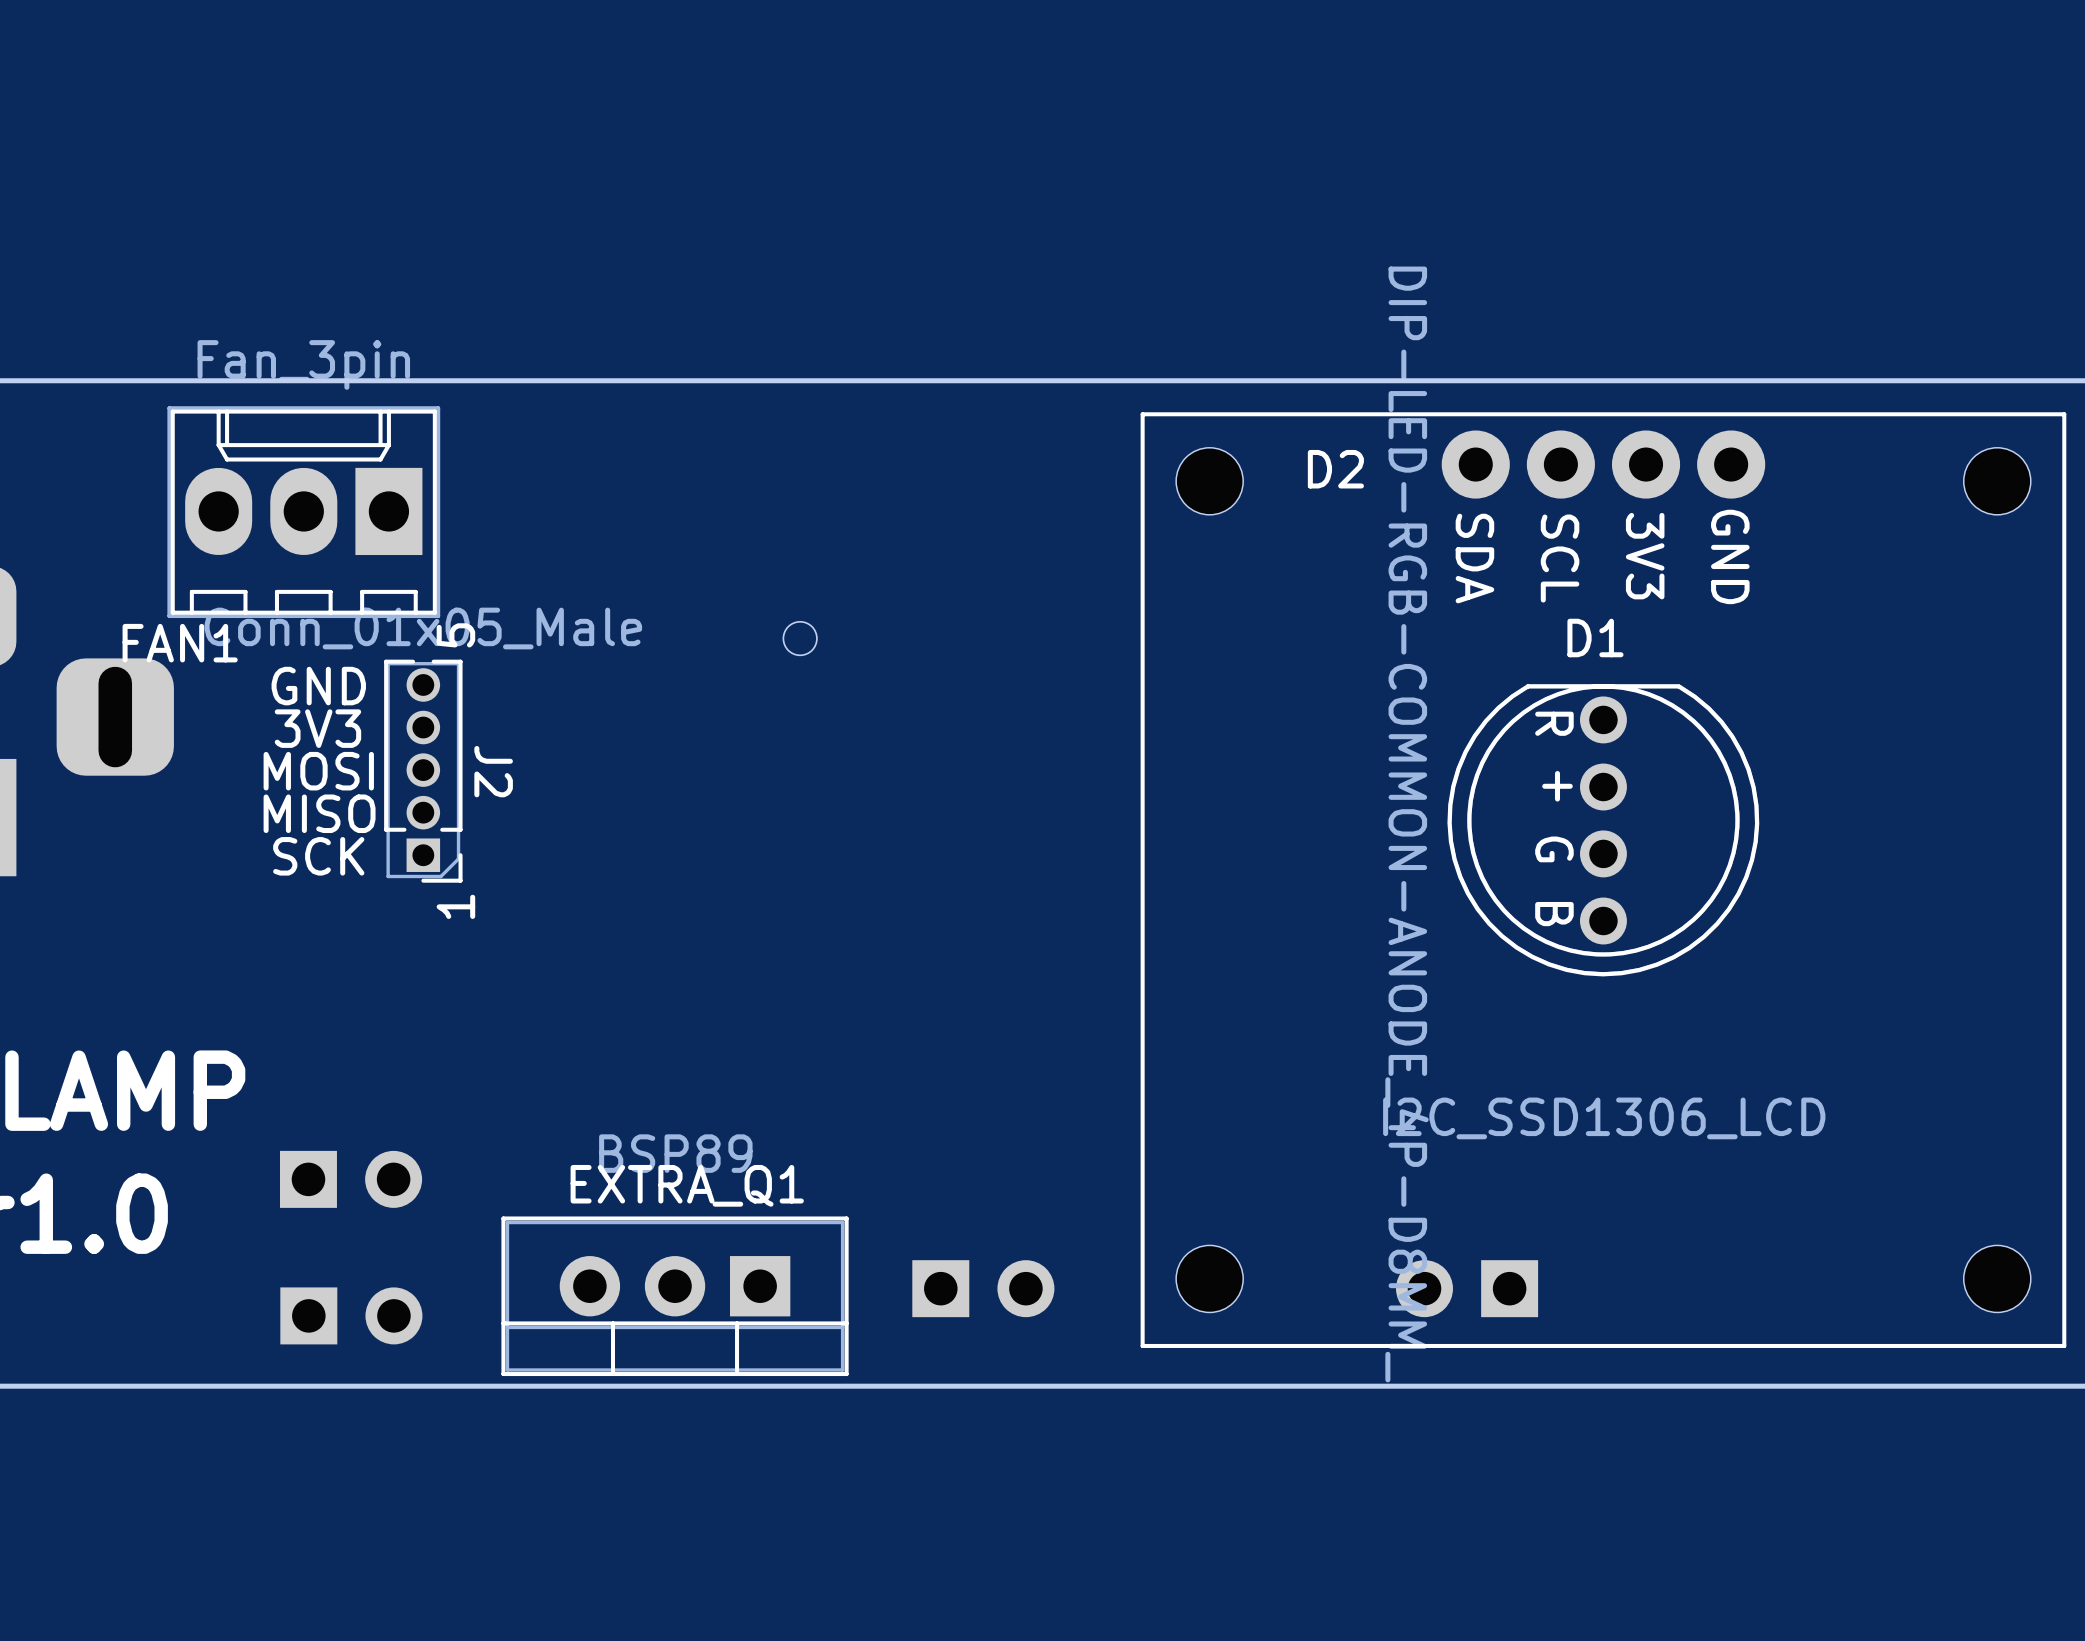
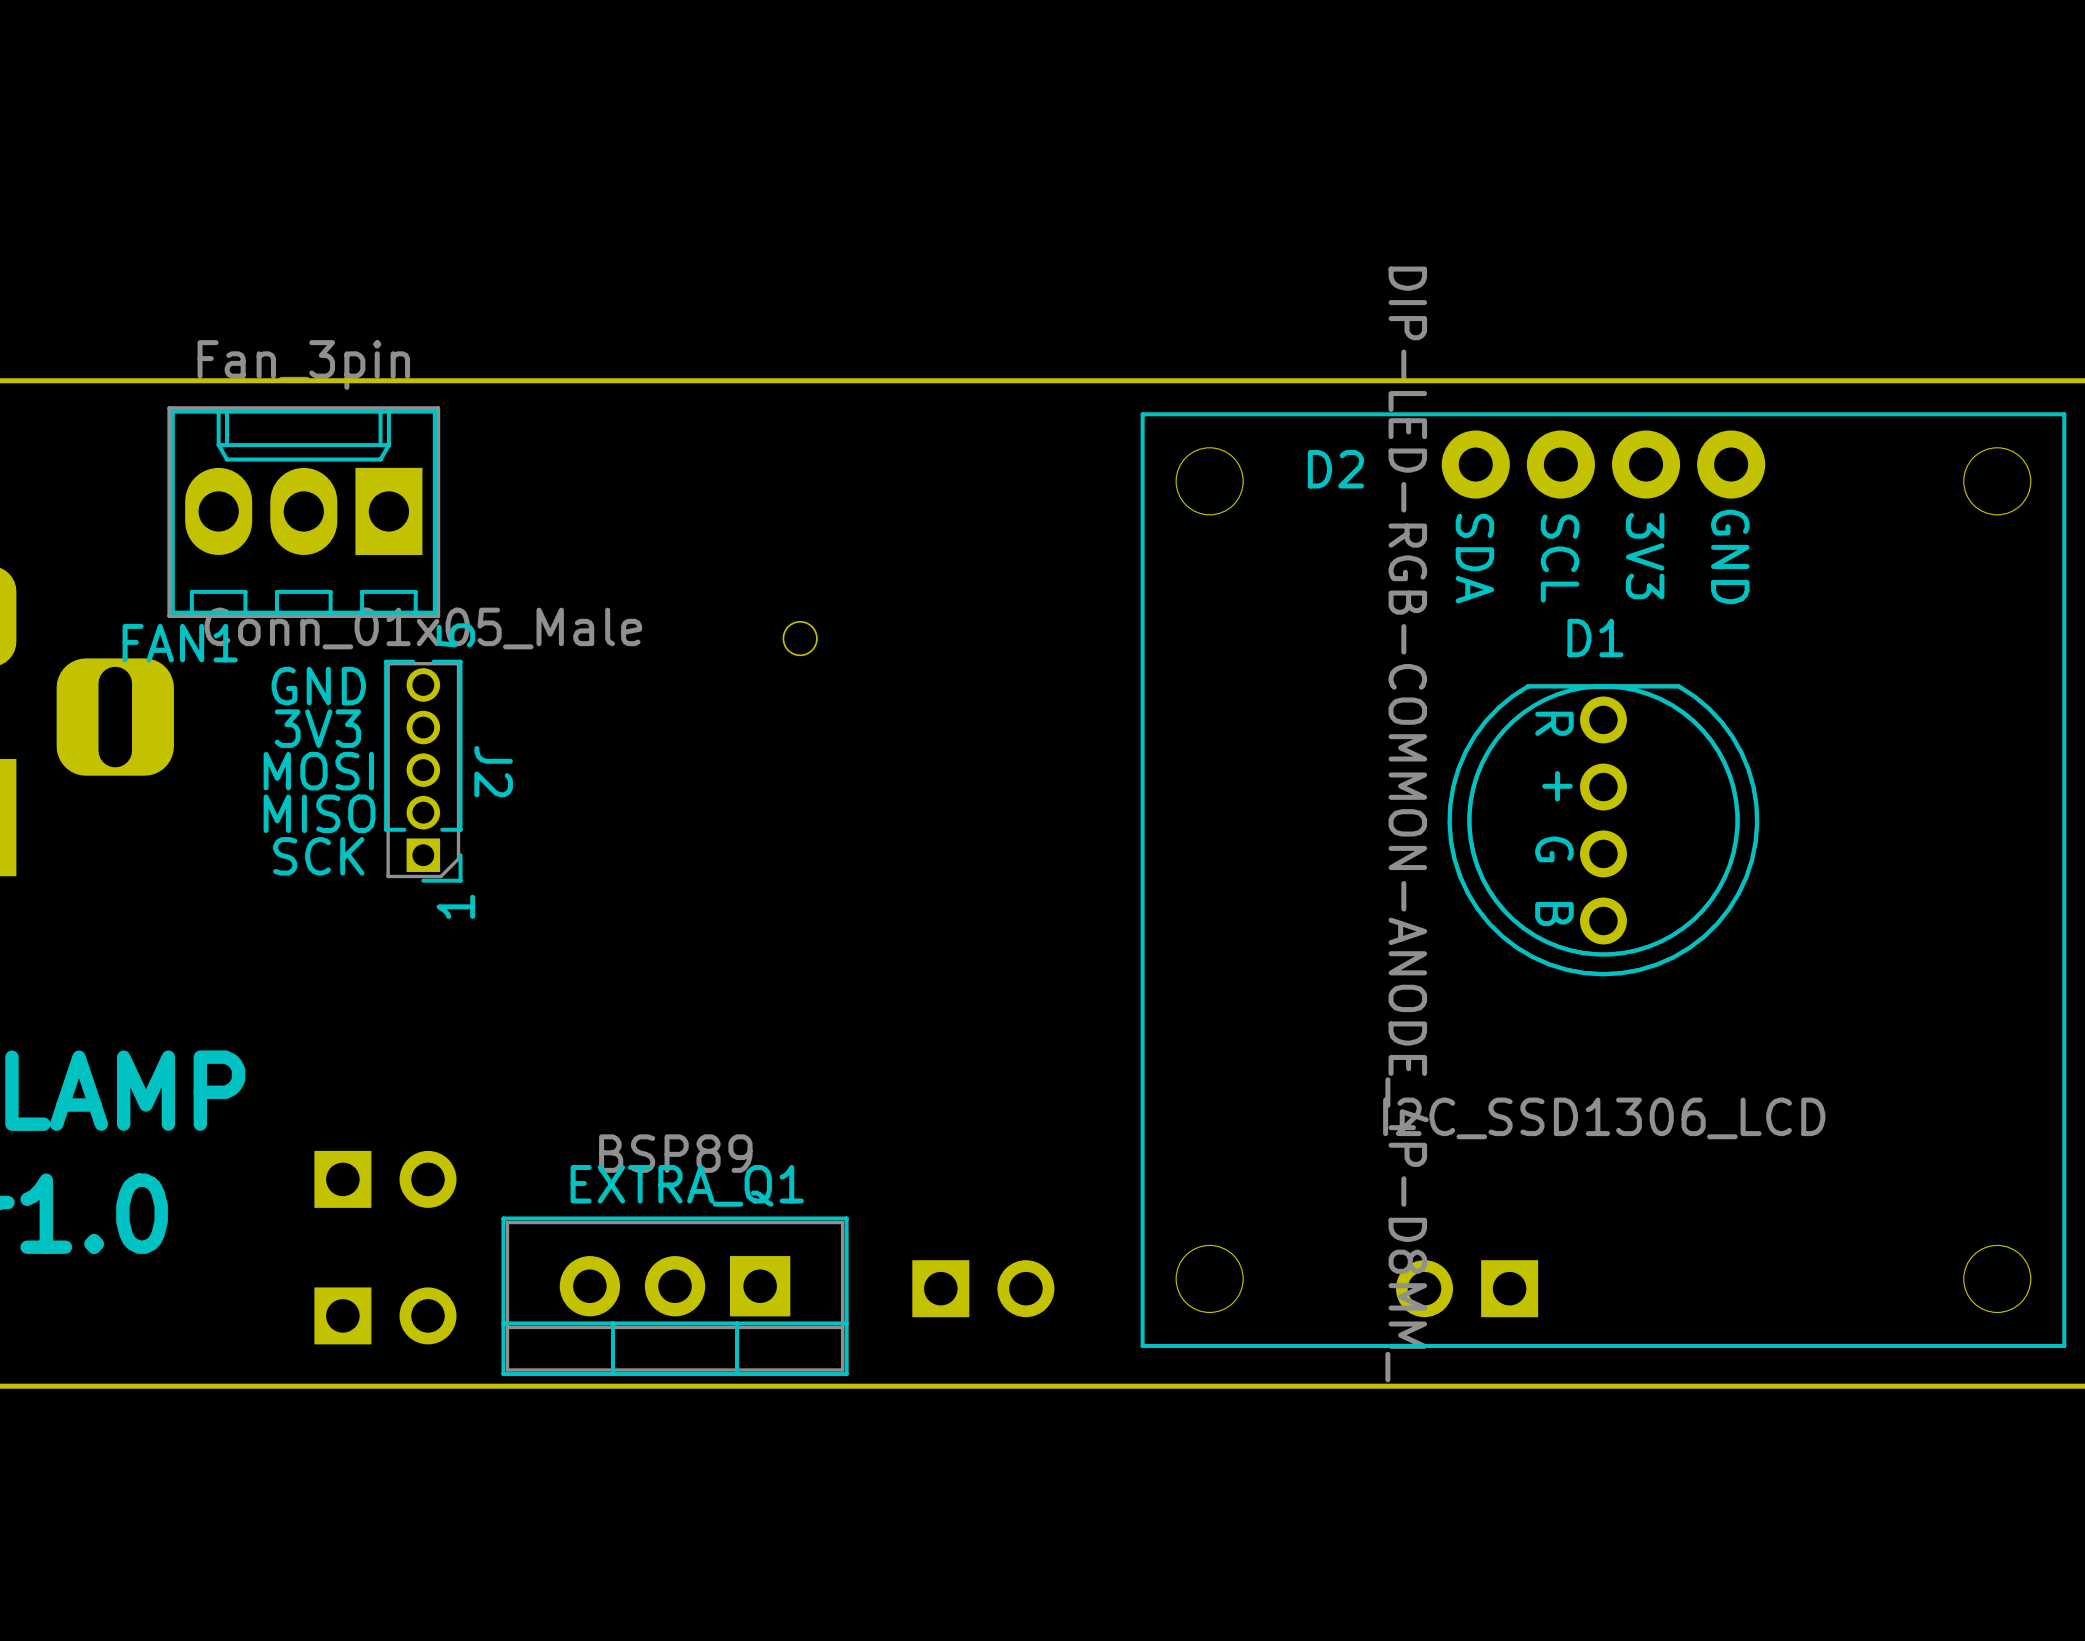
part position: (351, 1179) -> (385, 1179)
part position: (351, 1315) -> (385, 1315)

